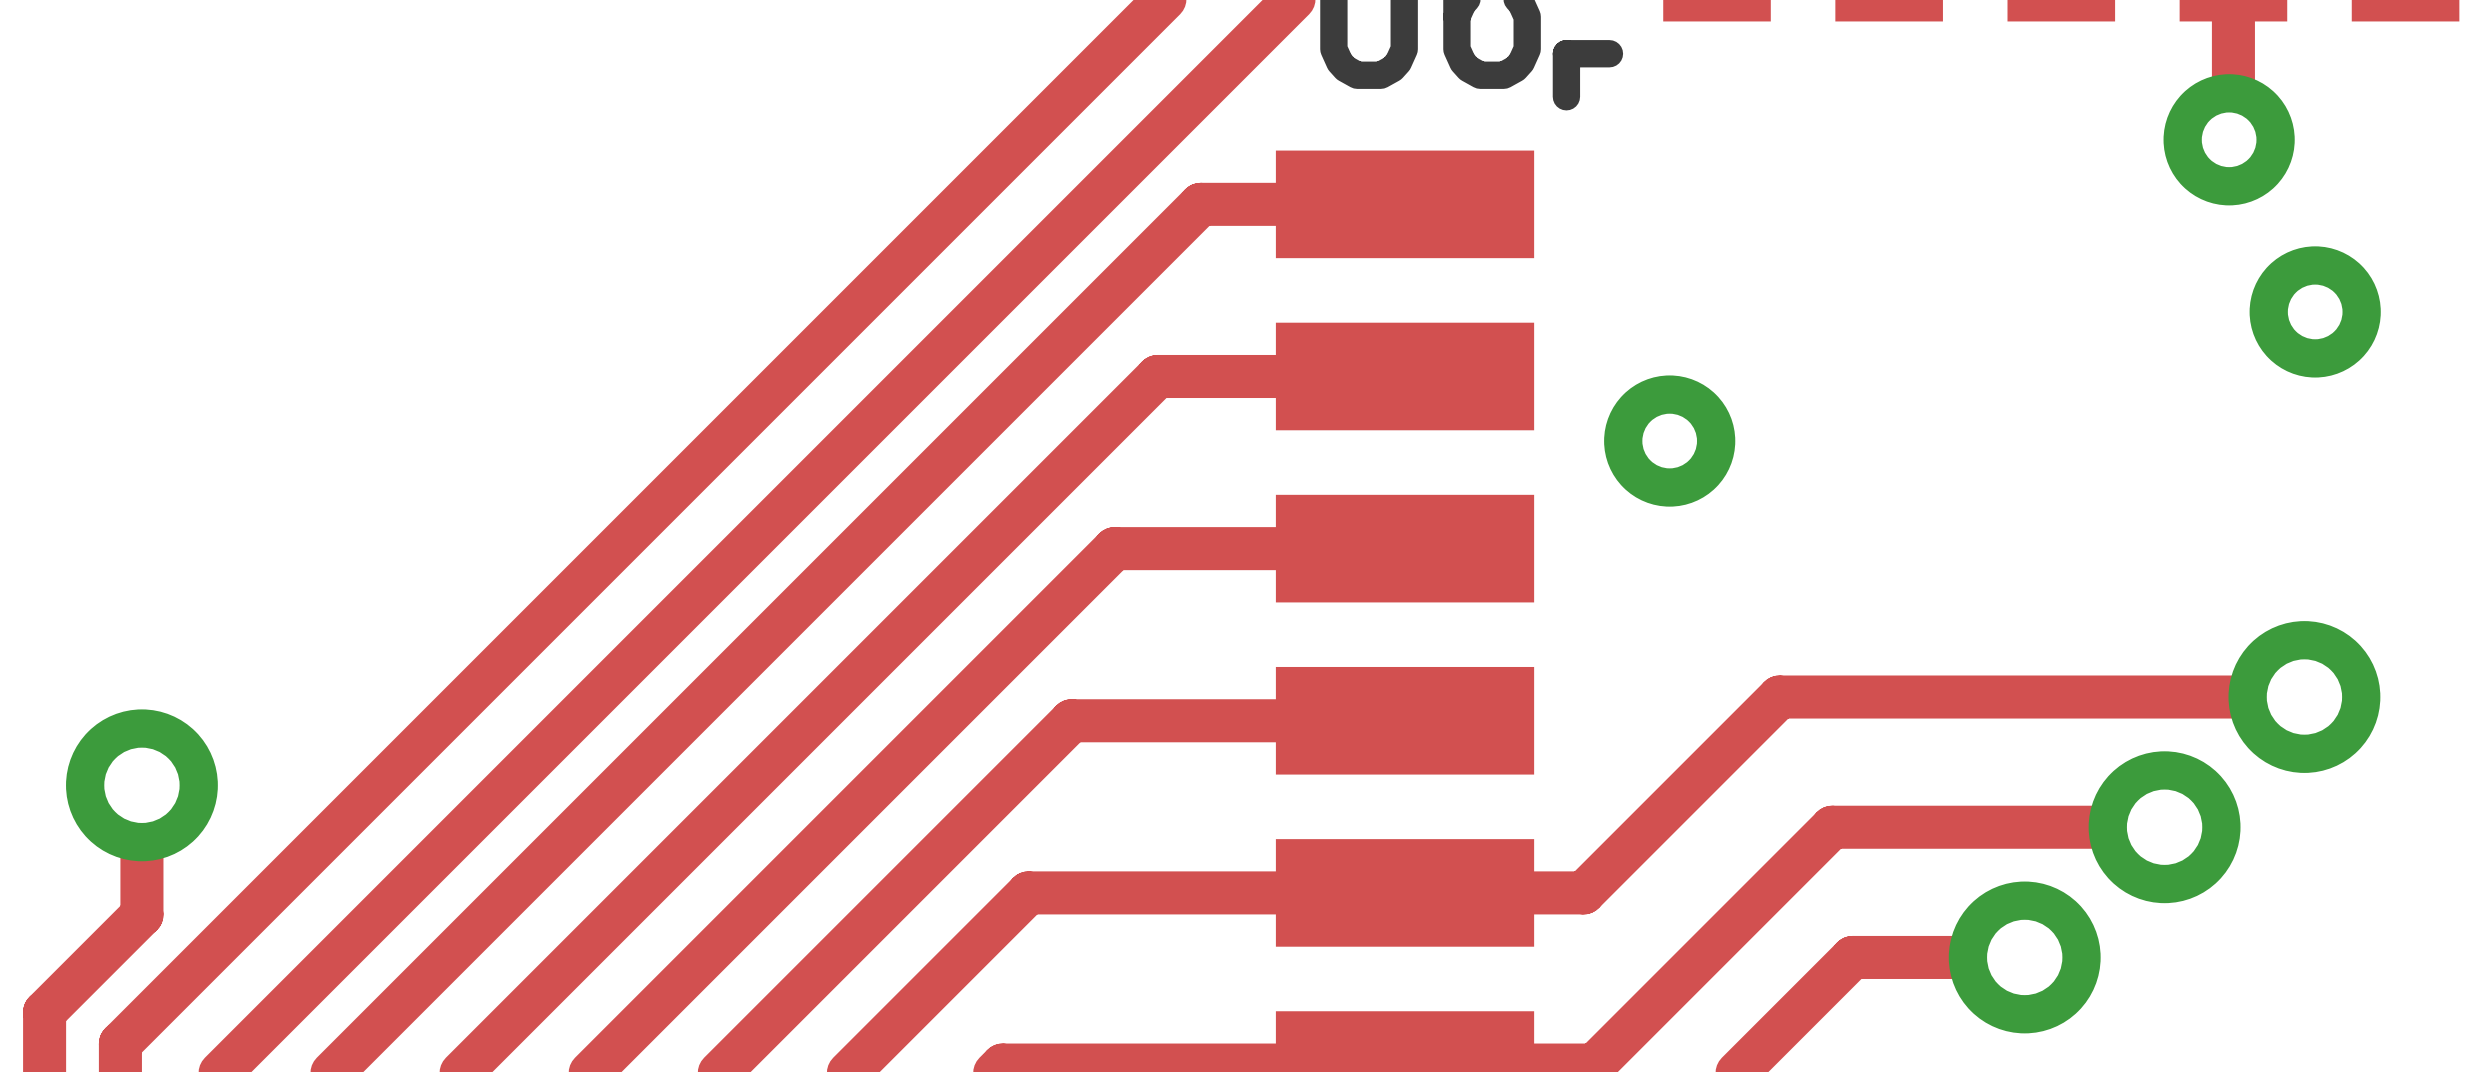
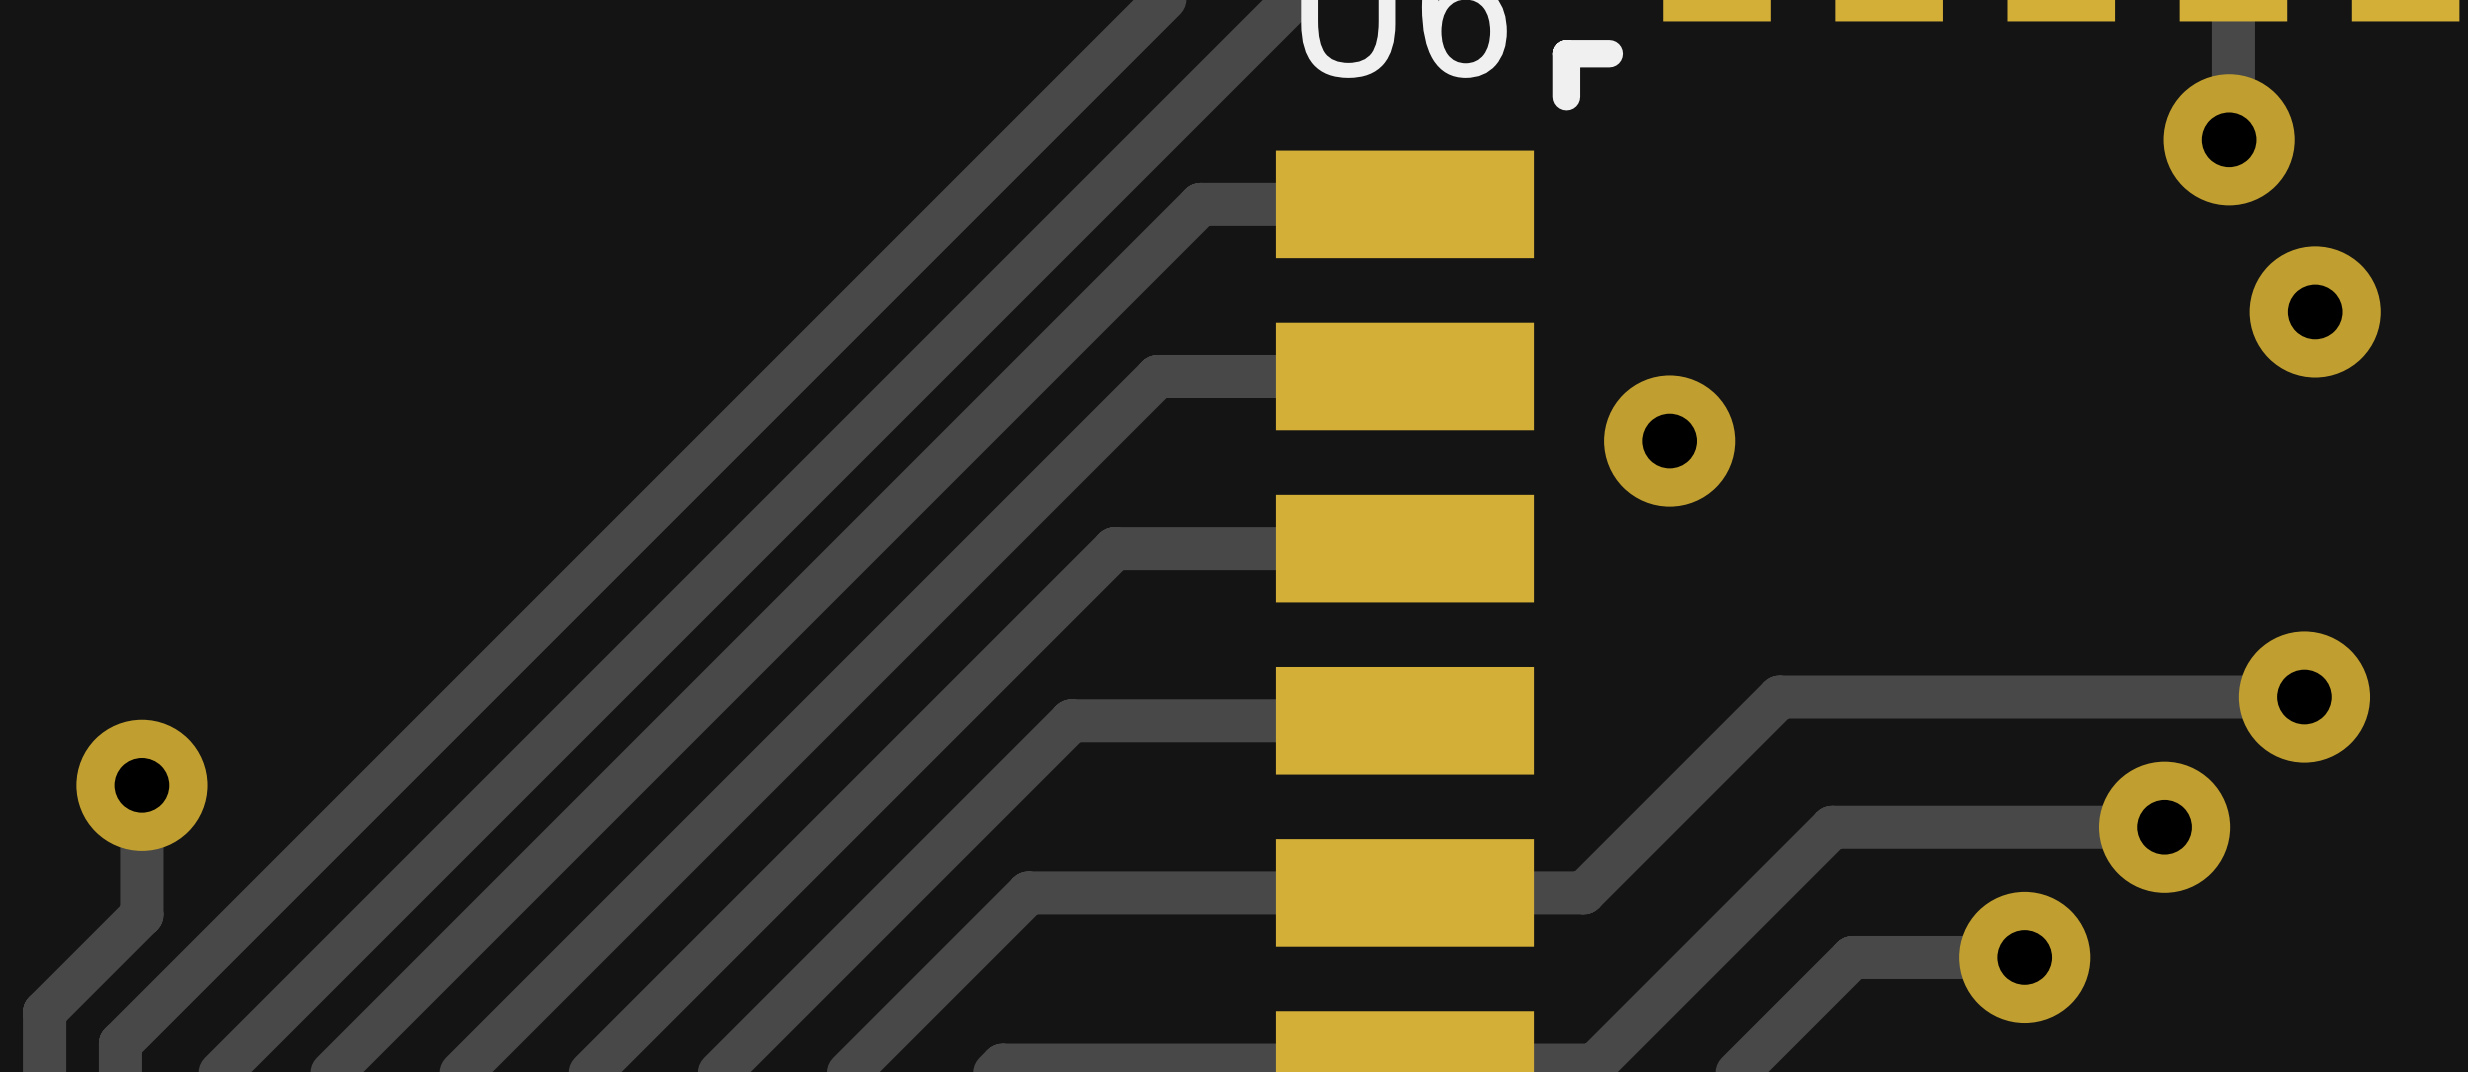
via size: [2228, 621, 2381, 773] -> [2238, 631, 2371, 763]
via size: [66, 709, 218, 862] -> [76, 719, 208, 851]
via size: [2088, 751, 2241, 904] -> [2098, 761, 2231, 893]
via size: [1948, 881, 2101, 1034] -> [1959, 891, 2091, 1024]

